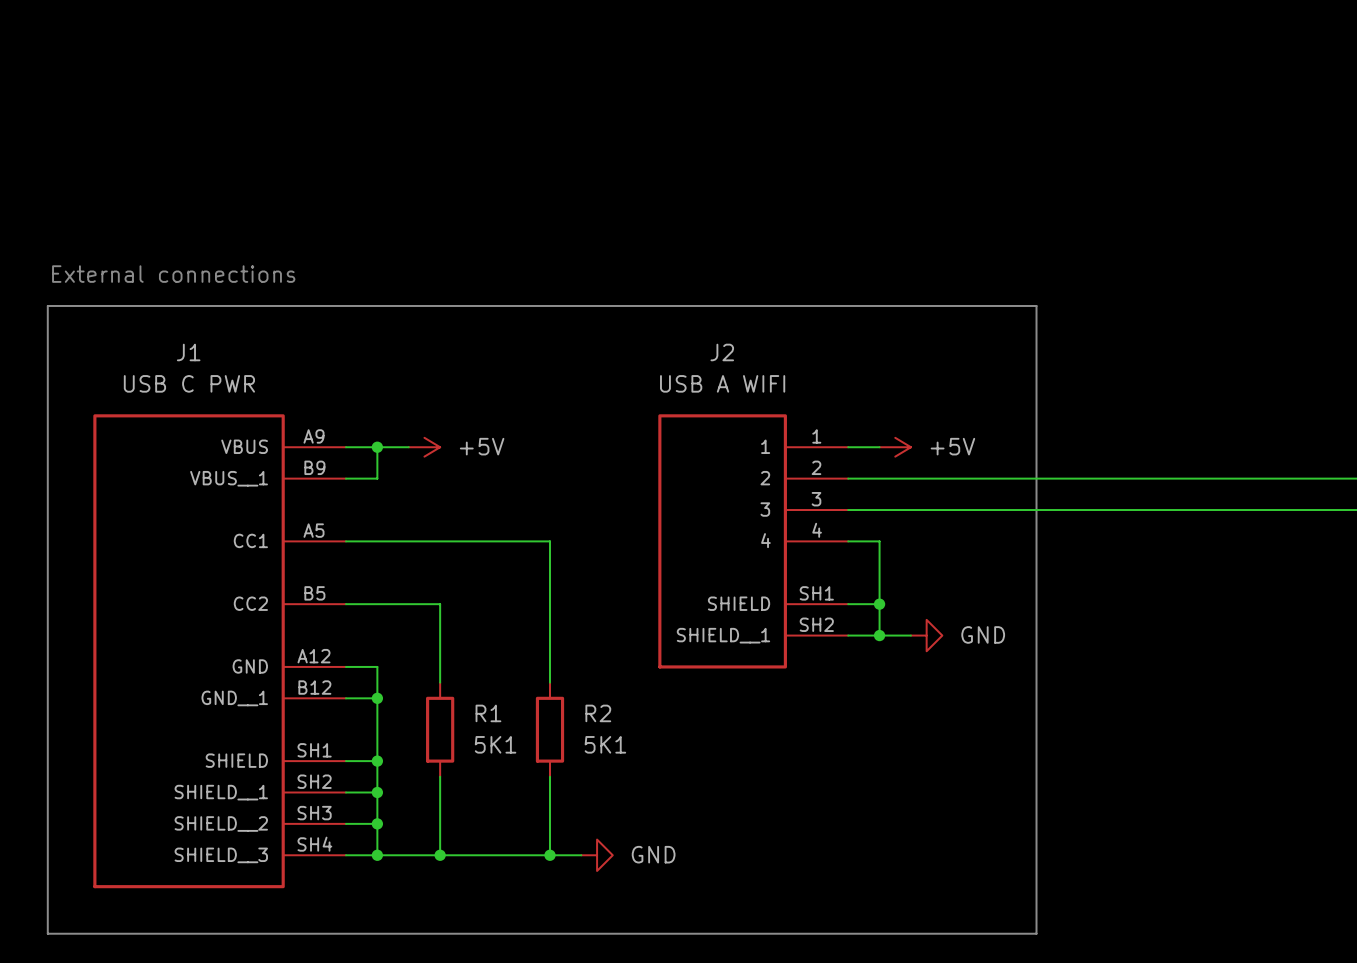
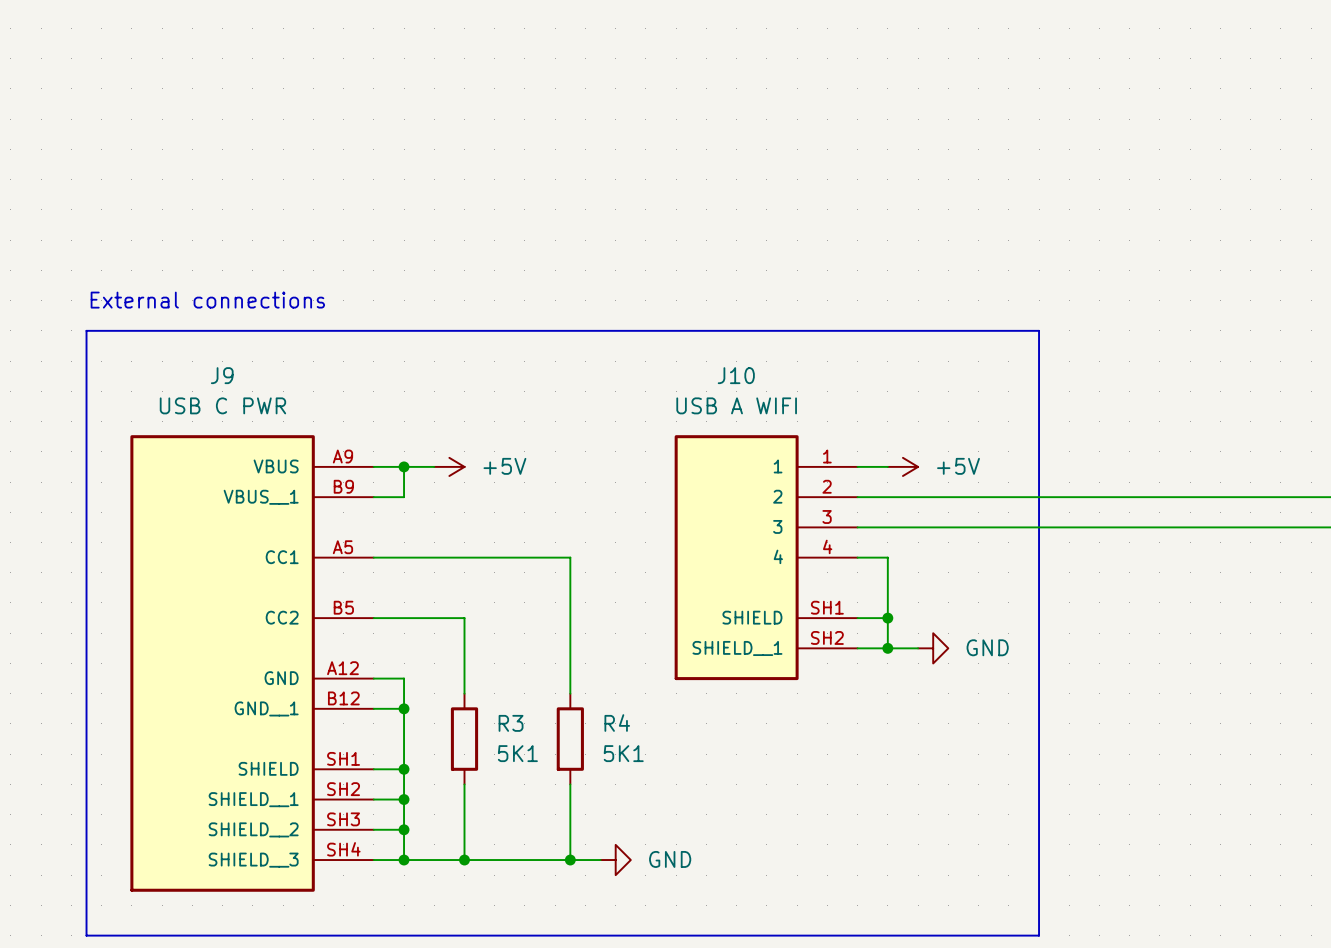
J1 name: J1 (188, 352) -> J9 (222, 375)
J2 name: J2 (722, 352) -> J10 (736, 375)
R1 name: R1 (488, 713) -> R3 (511, 723)
R2 name: R2 (598, 713) -> R4 (617, 723)

